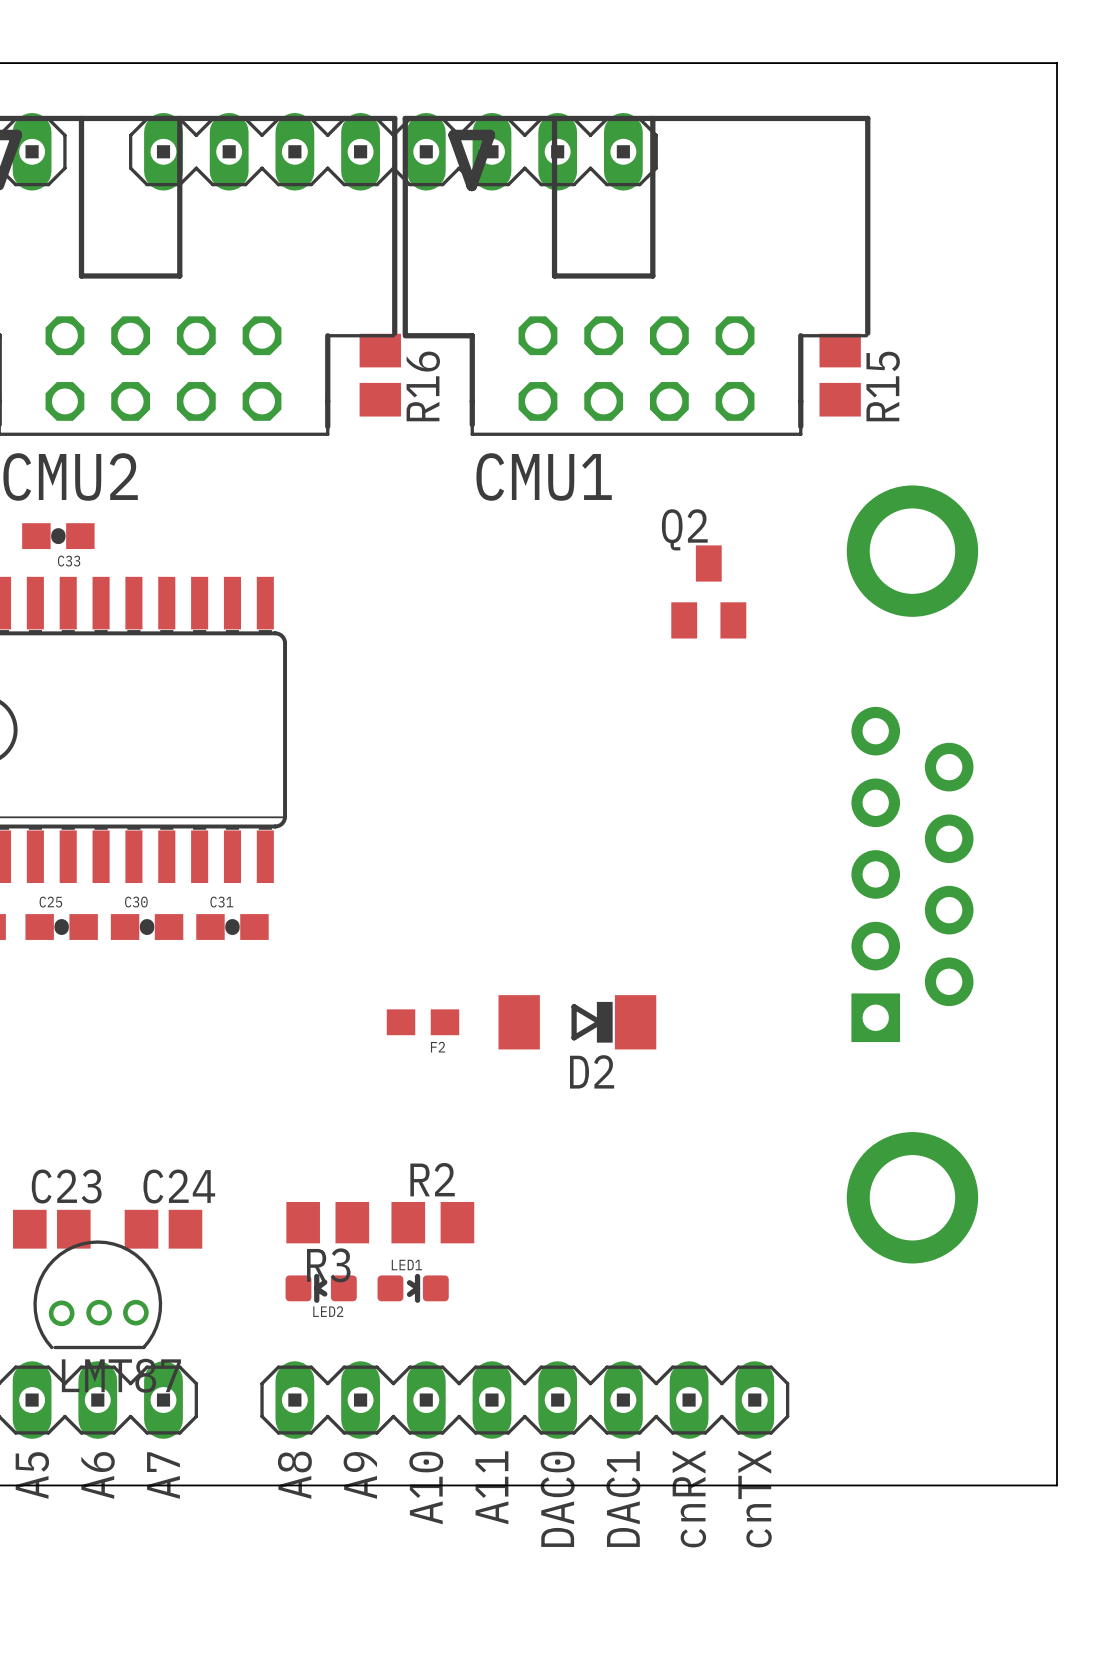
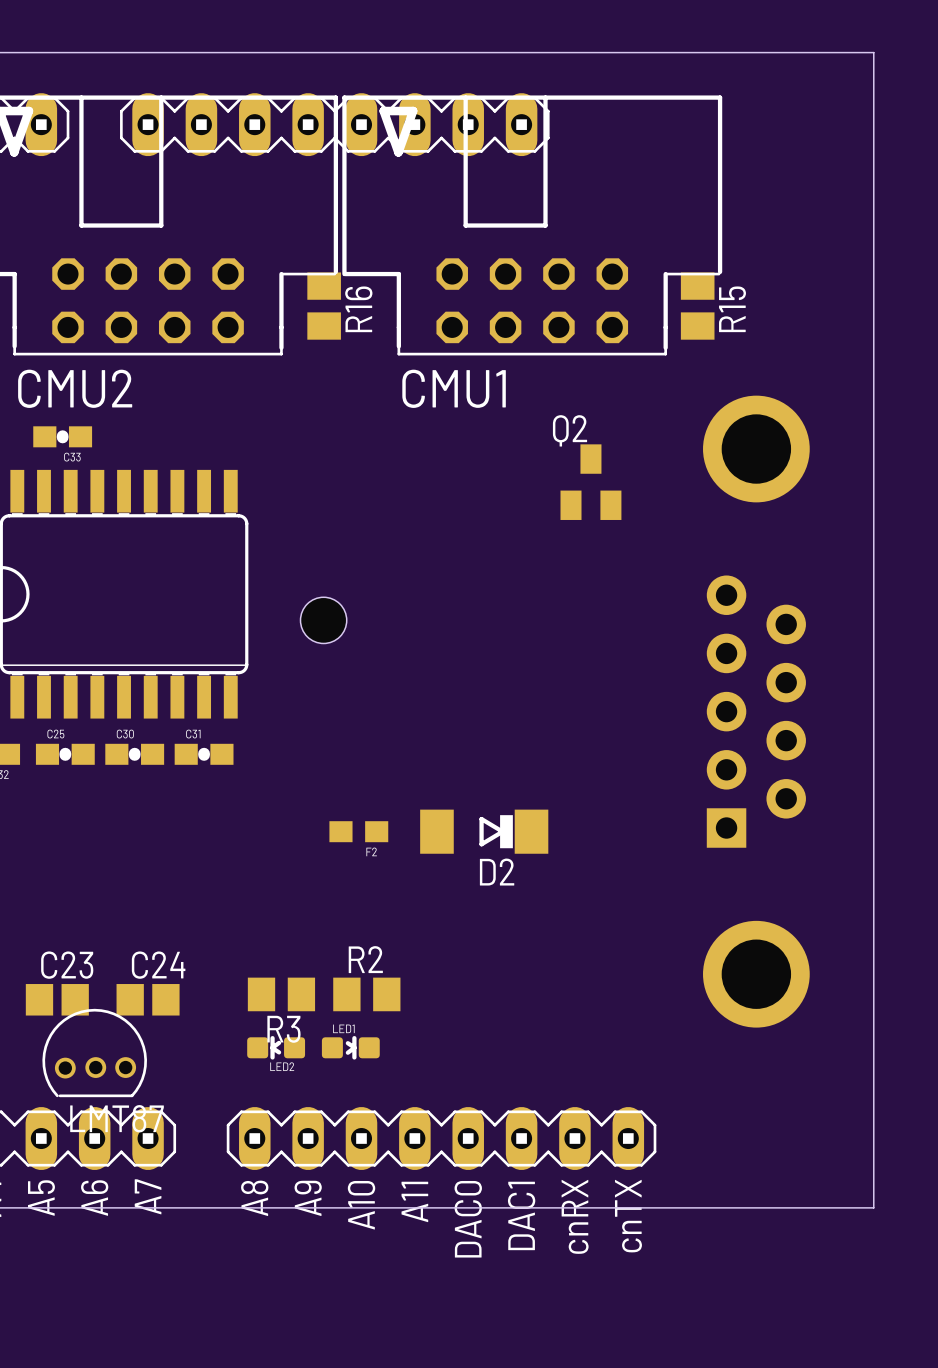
hole: none -> (323, 620)

